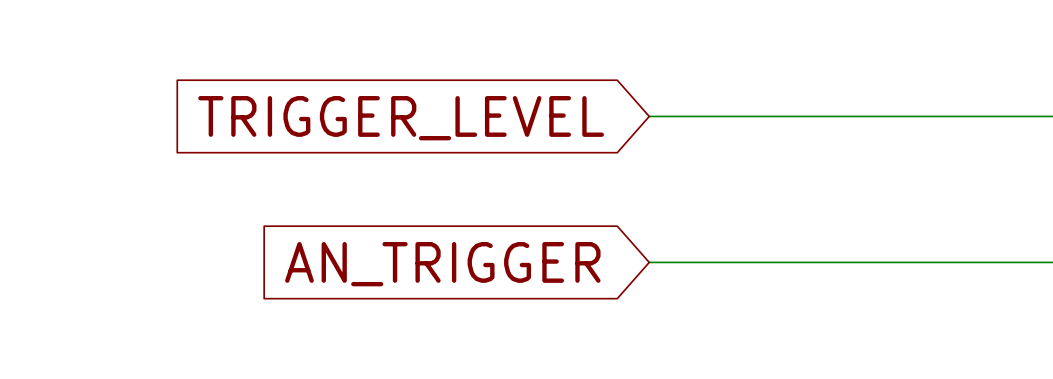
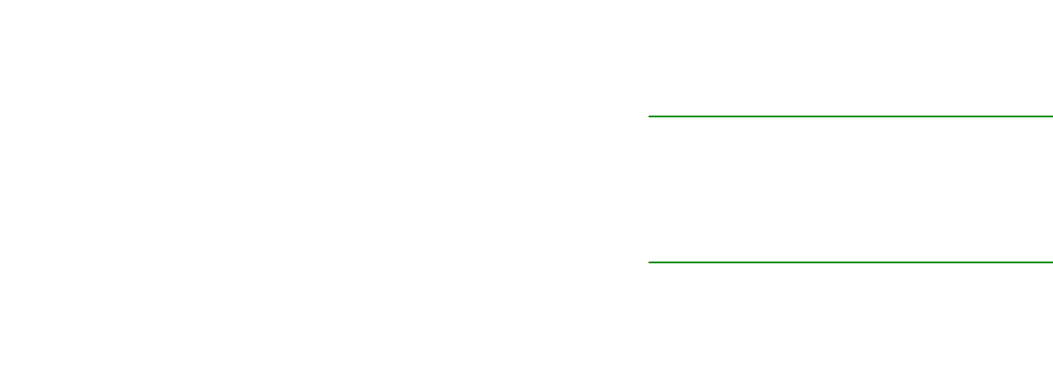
global label: TRIGGER_LEVEL (401, 118) -> none
global label: AN_TRIGGER (442, 264) -> none

